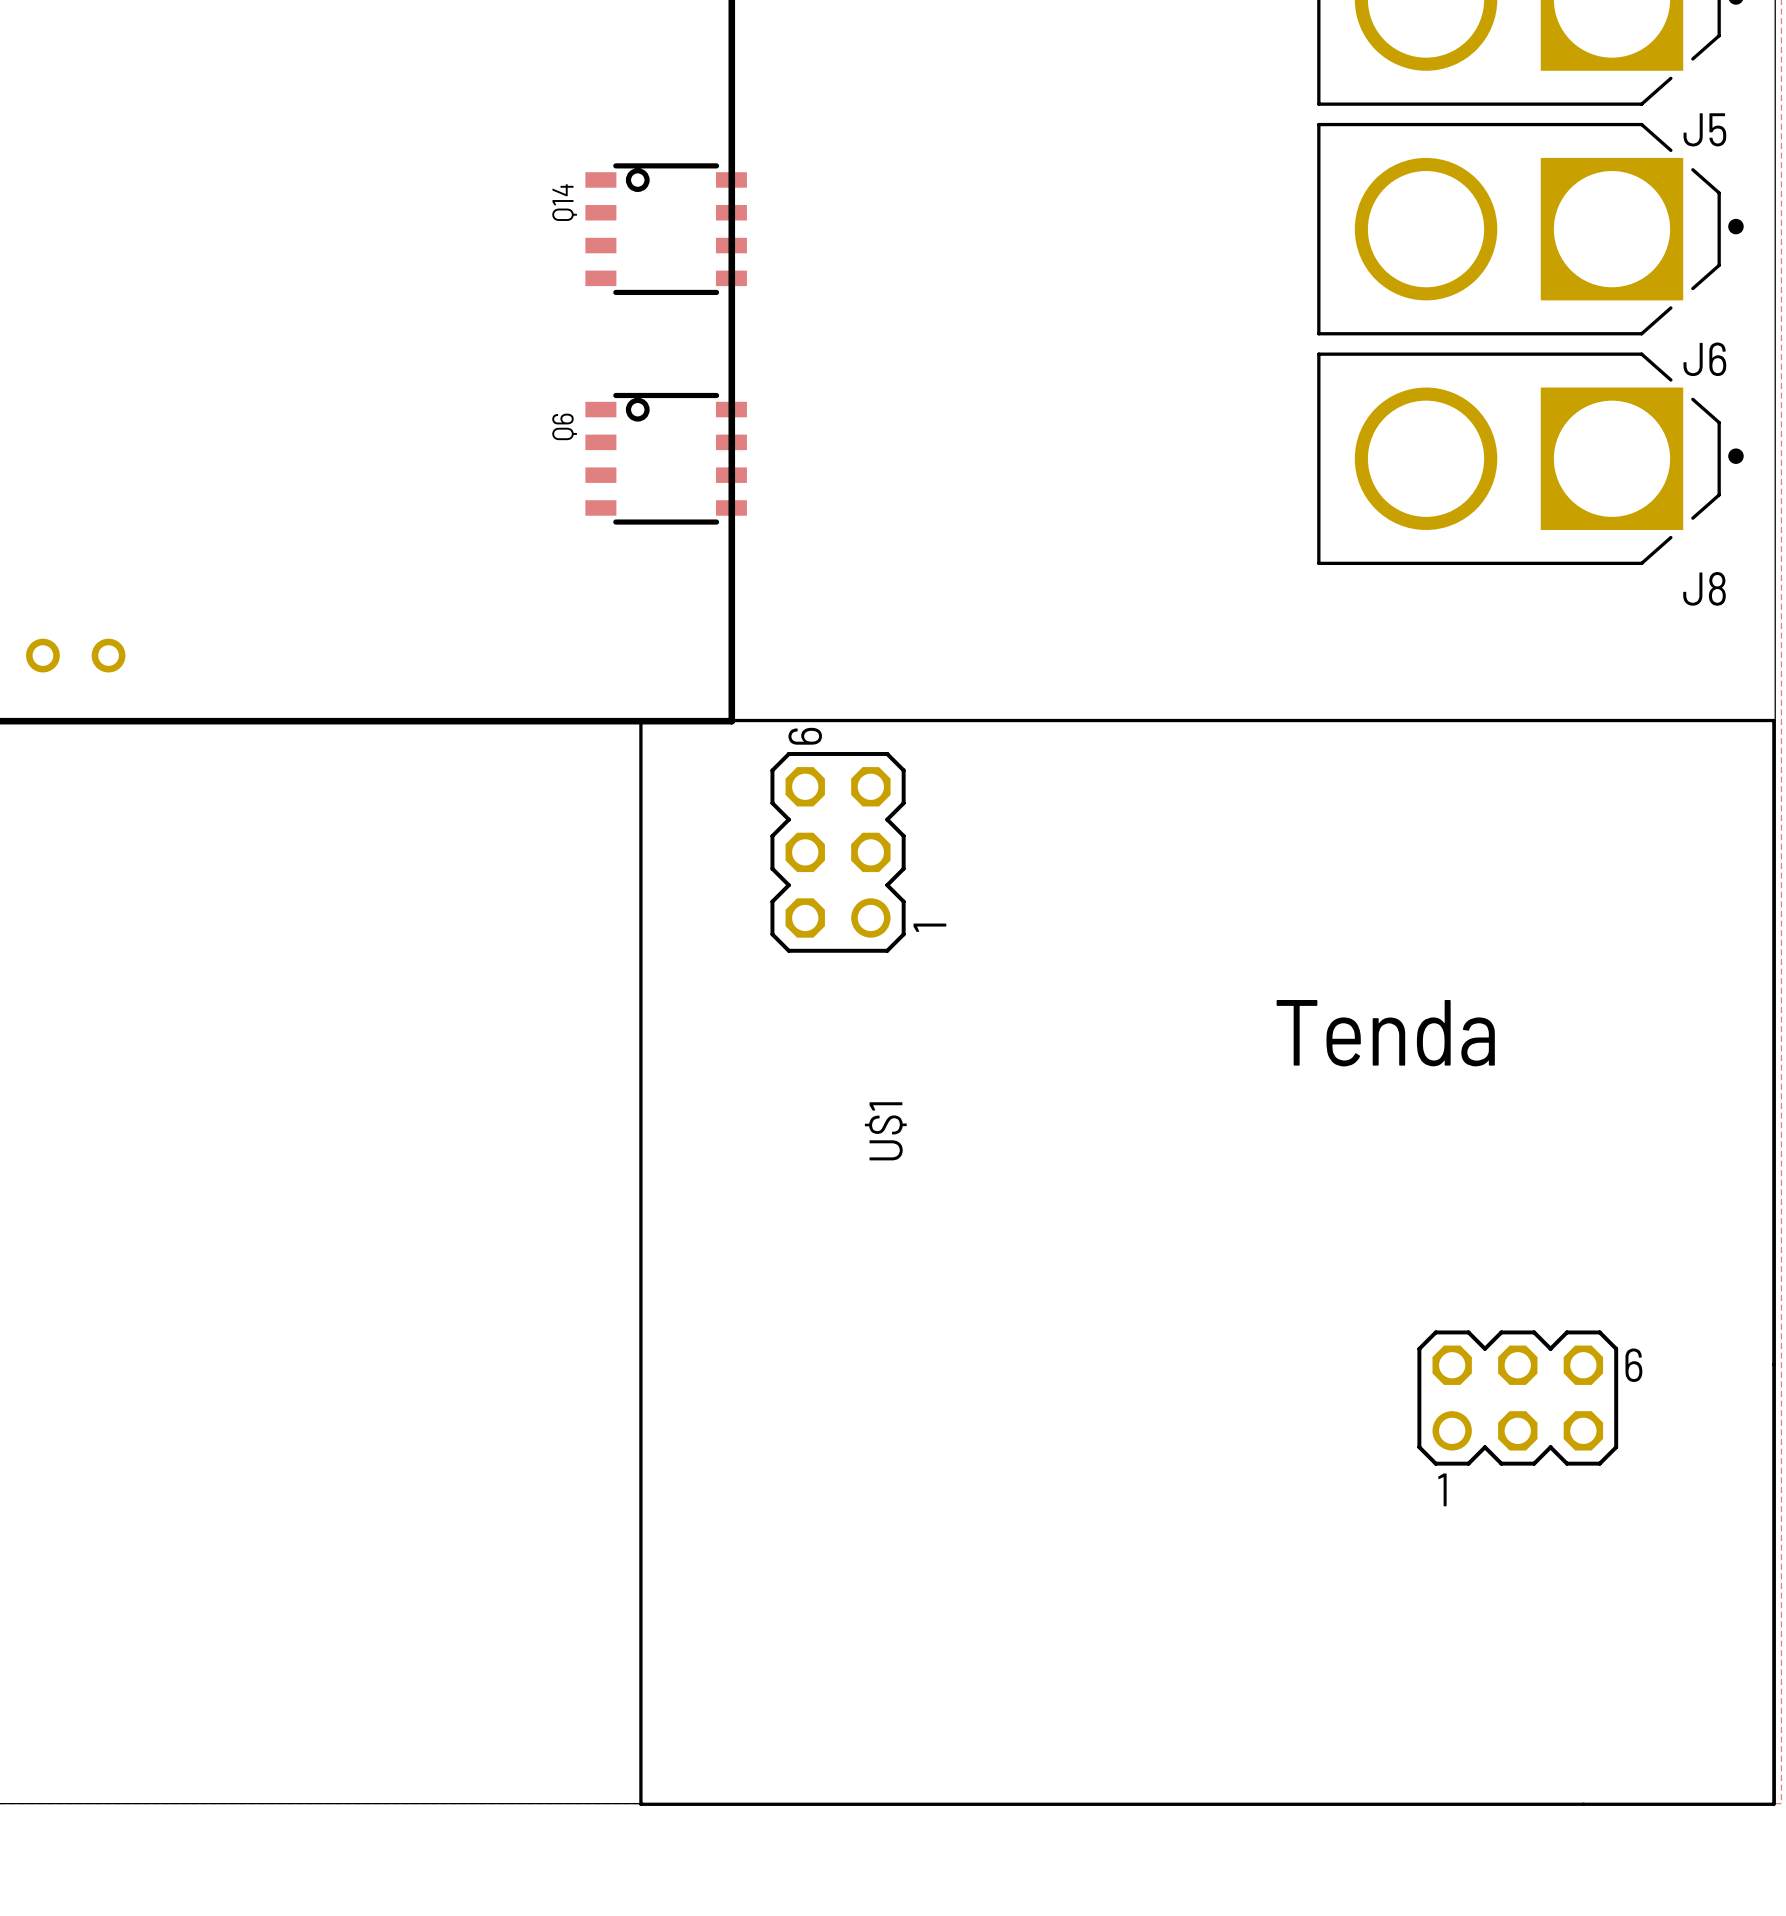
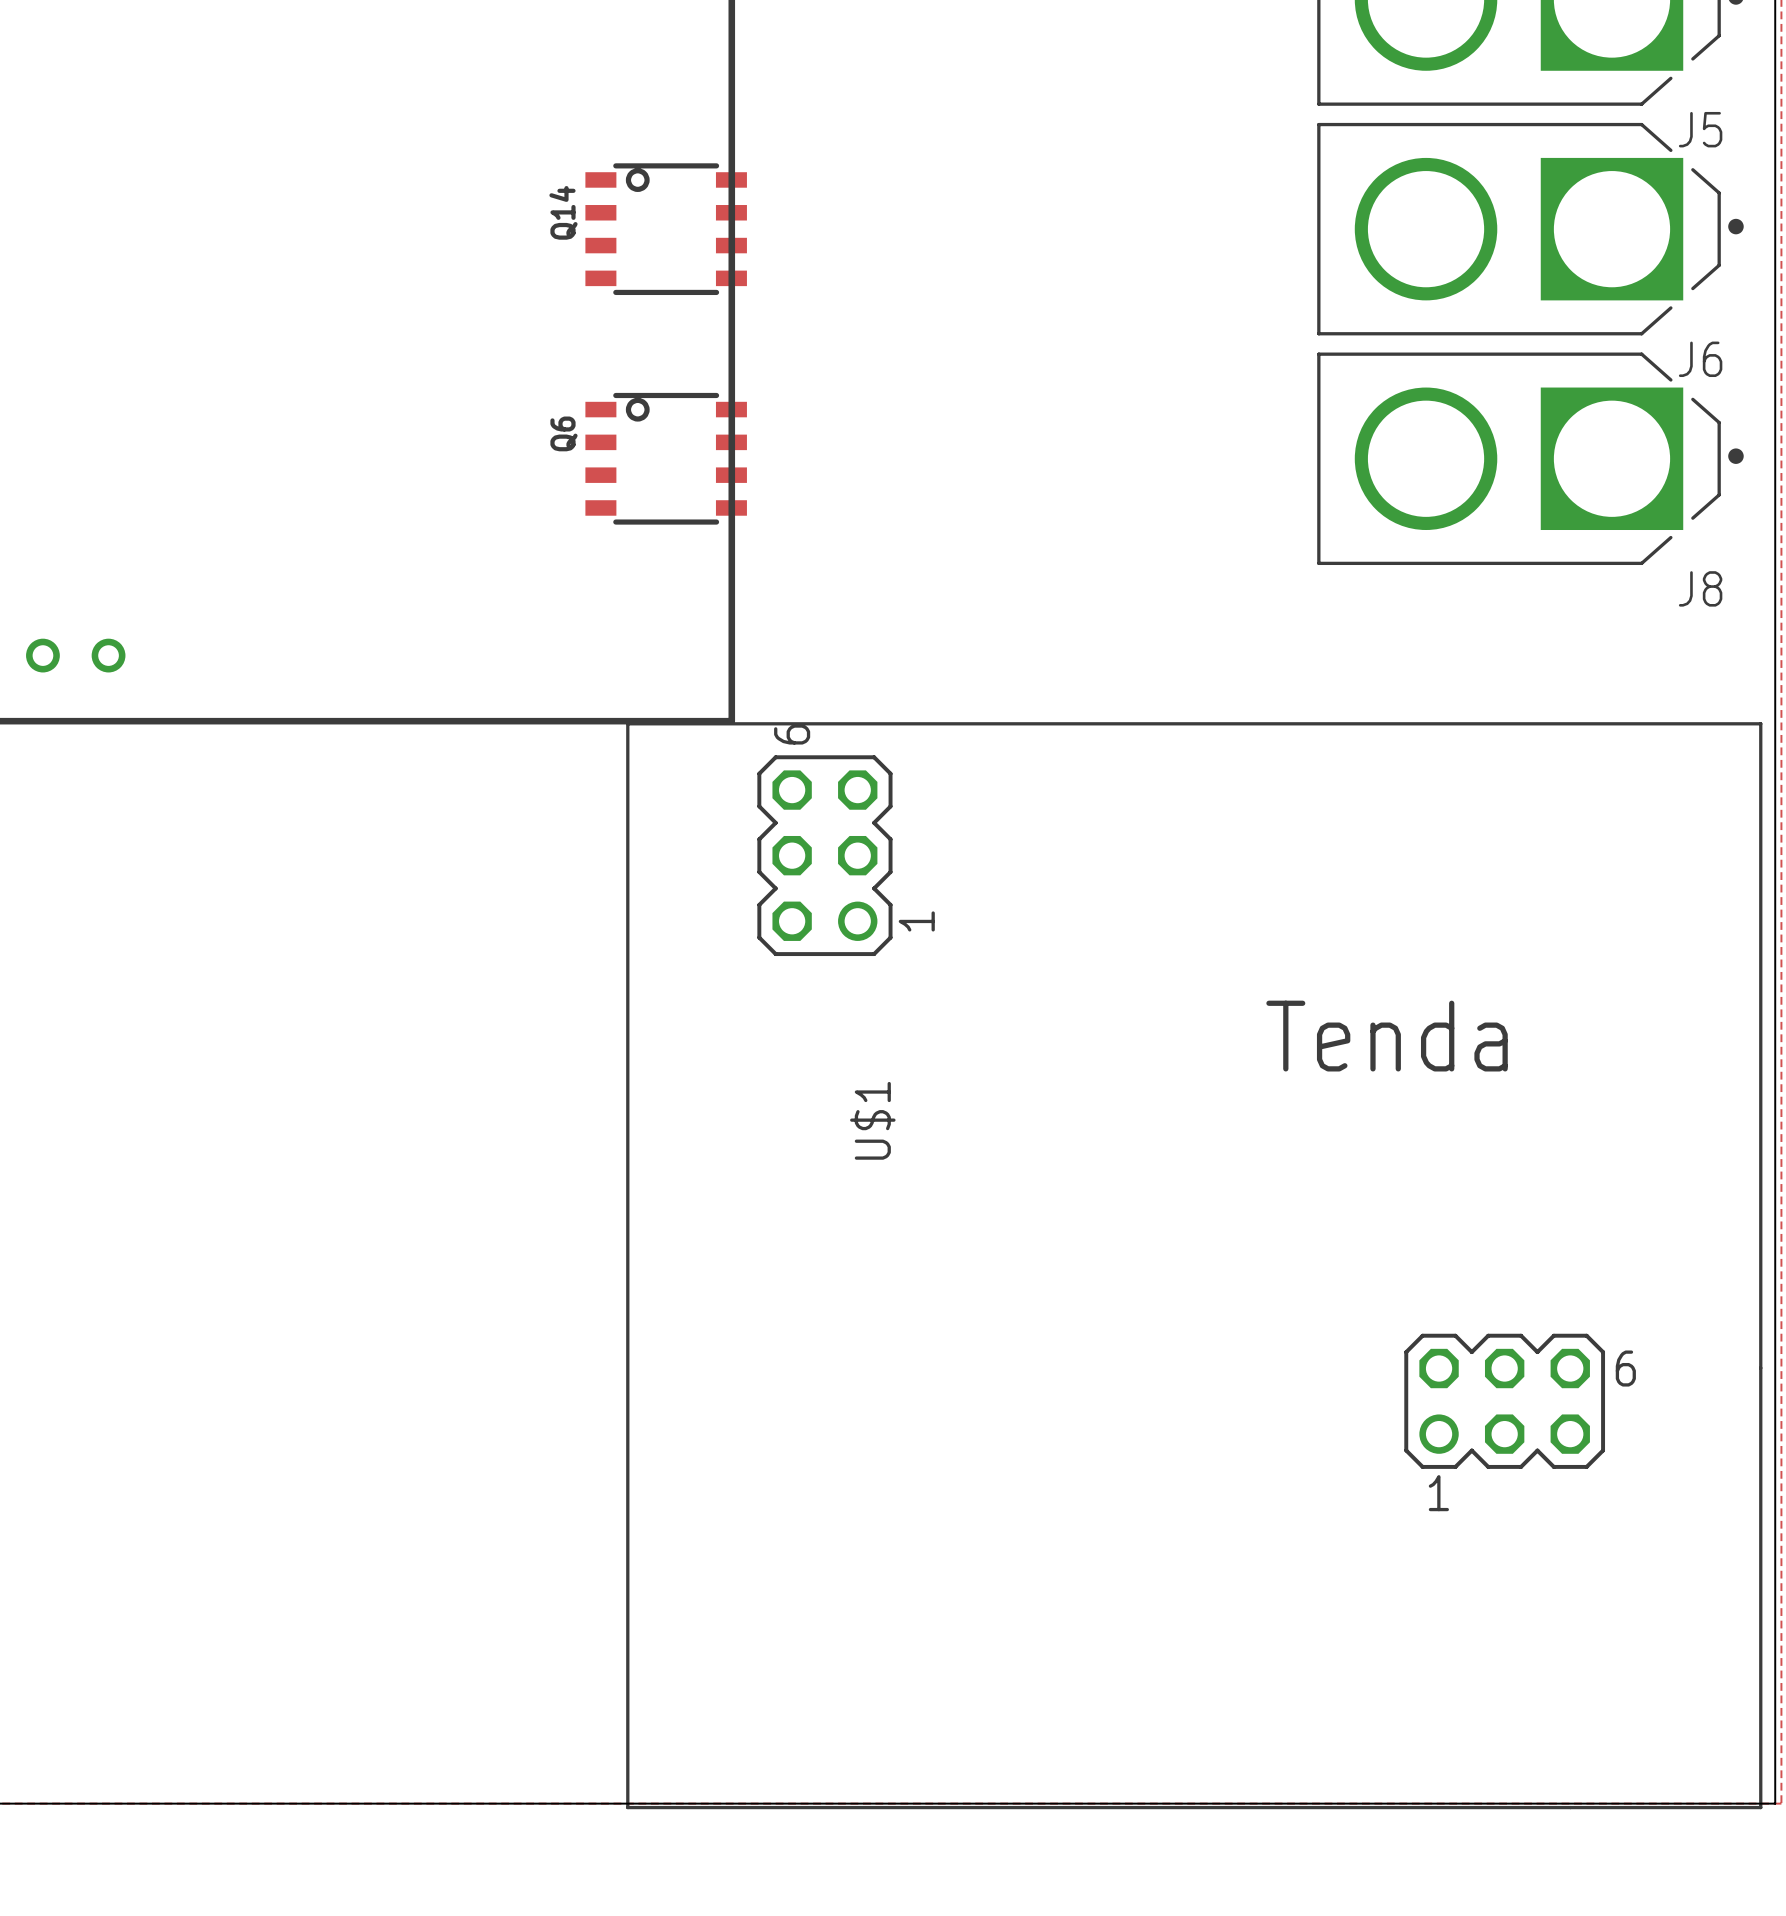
U$1 position: (1207, 1262) -> (1194, 1265)

